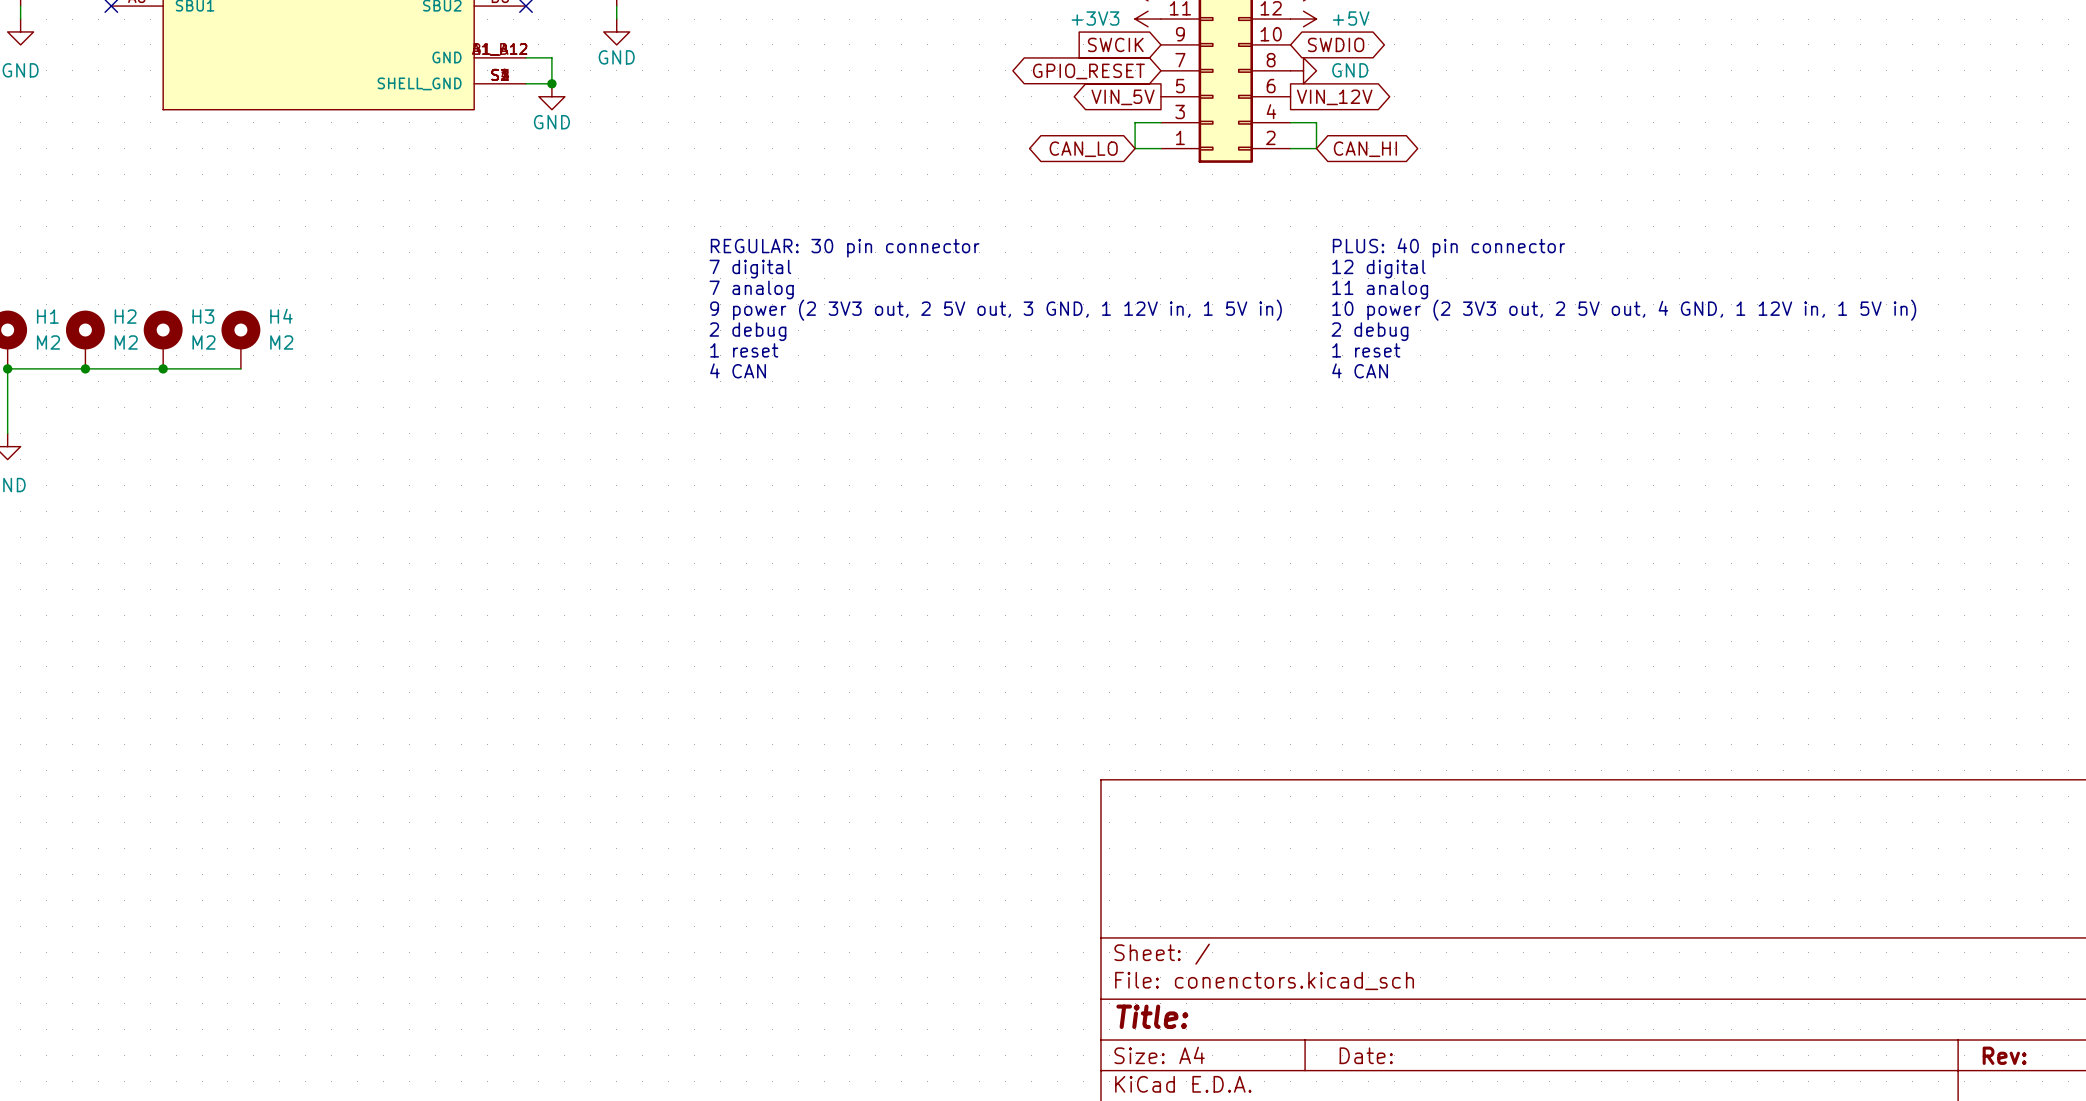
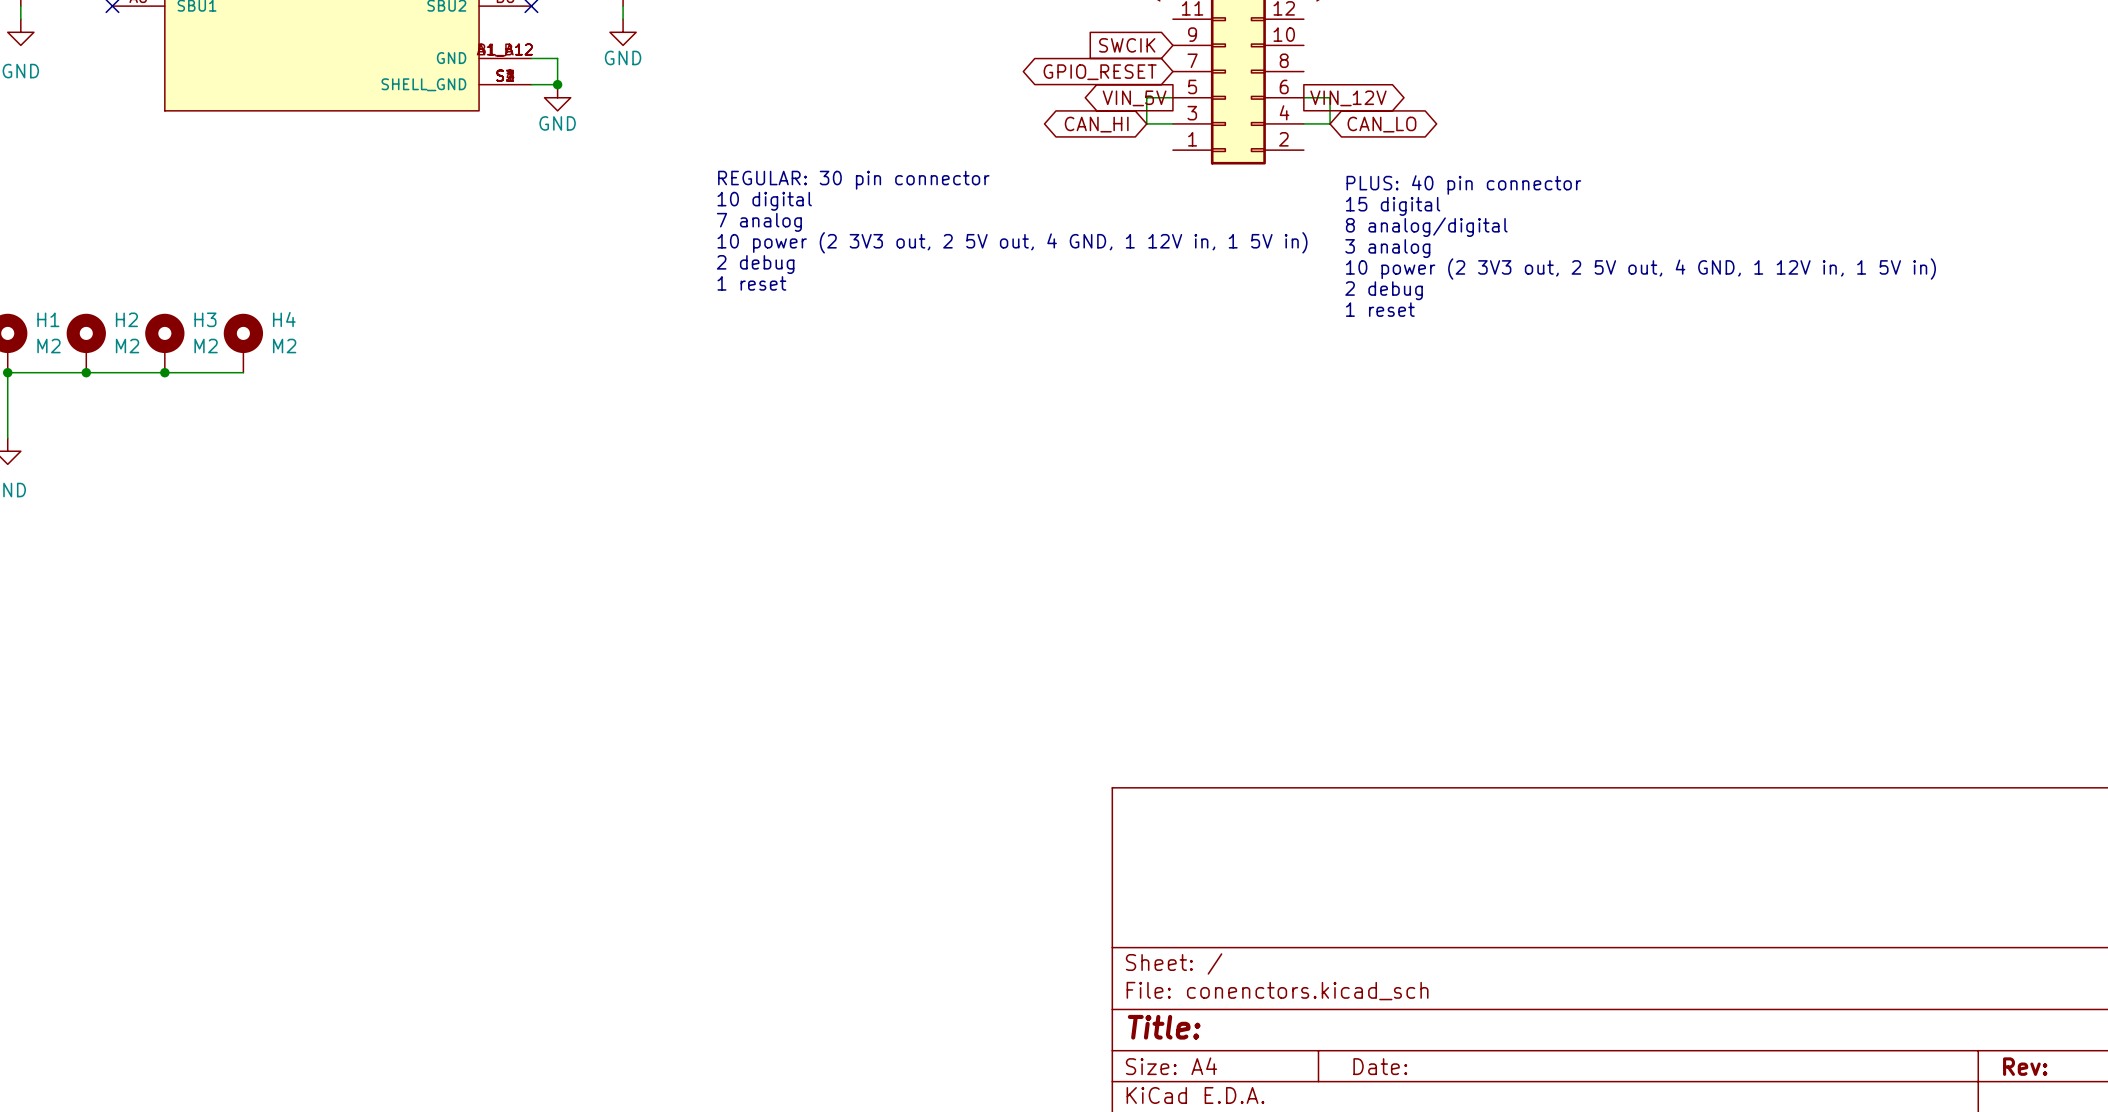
power symbol: +3V3 (1148, 19) -> none
power symbol: +5V (1303, 19) -> none
global label: SWDIO (1336, 44) -> none
power symbol: GND (1303, 70) -> none
wire: (1135, 122) (1135, 148) (1160, 148) -> (1146, 123) (1146, 97) (1172, 97)
wire: (1316, 122) (1316, 148) (1290, 148) -> (1330, 123) (1330, 97) (1303, 97)
global label rotation: 0° (1083, 149) -> 180° (1381, 124)
global label position: CAN_LO (1083, 149) -> CAN_LO (1381, 124)
global label rotation: 0° (1365, 149) -> 180° (1096, 124)
global label position: CAN_HI (1365, 149) -> CAN_HI (1096, 124)
text: none -> 10 digital (764, 201)
text: none -> 15 digital (1393, 206)
text: none -> 8 analog/digital (1426, 227)
text: none -> 10 power (2 3V3 out, 2 5V out, 4 GND, 1 12V in, 1 5V in) (1012, 242)
text: none -> 3 analog (1387, 248)
text position: PLUS: 40 pin connector (1448, 247) -> PLUS: 40 pin connector (1463, 184)
text position: REGULAR: 30 pin connector (845, 248) -> REGULAR: 30 pin connector (853, 180)
text: 7 digital (750, 269) -> none
text: 12 digital (1378, 269) -> none
text position: 7 analog (751, 289) -> 7 analog (759, 222)
text: 11 analog (1380, 289) -> none
text: 9 power (2 3V3 out, 2 5V out, 3 GND, 1 12V in, 1 5V in) (996, 310) -> none
text position: 10 power (2 3V3 out, 2 5V out, 4 GND, 1 12V in, 1 5V in) (1624, 310) -> 10 power (2 3V3 out, 2 5V out, 4 GND, 1 12V in, 1 5V in) (1640, 269)
text position: 2 debug (747, 331) -> 2 debug (755, 264)
text position: 2 debug (1369, 331) -> 2 debug (1384, 290)
text position: 1 reset (744, 350) -> 1 reset (751, 283)
text position: 1 reset (1366, 350) -> 1 reset (1380, 309)
text: 4 CAN (738, 370) -> none
text: 4 CAN (1360, 370) -> none

